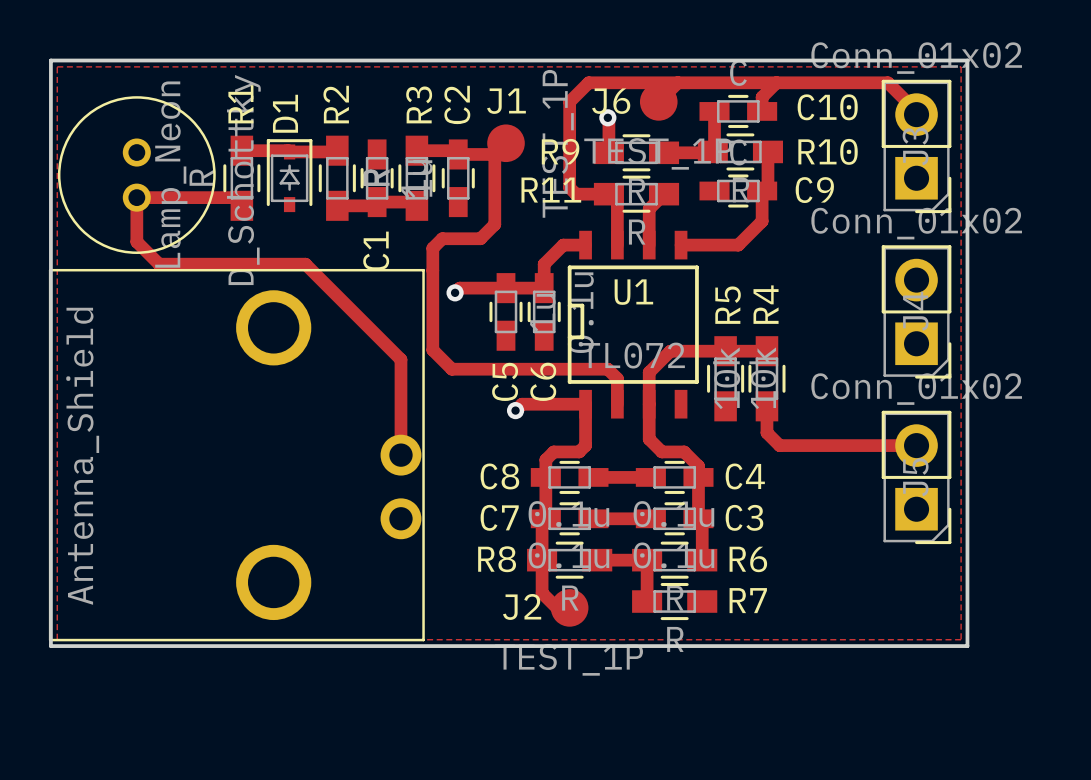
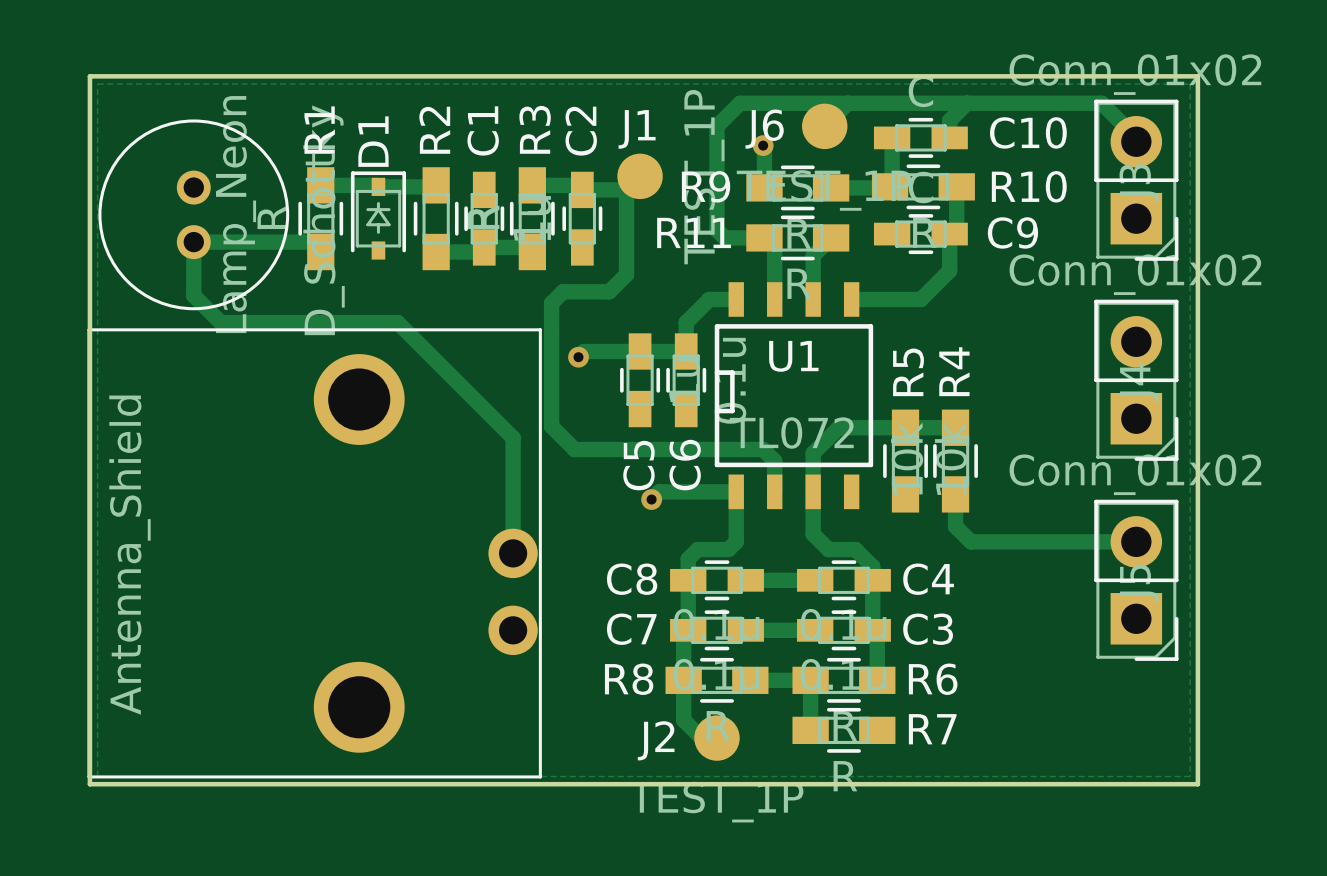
C1 name position: C1 (376, 251) -> C1 (483, 130)

